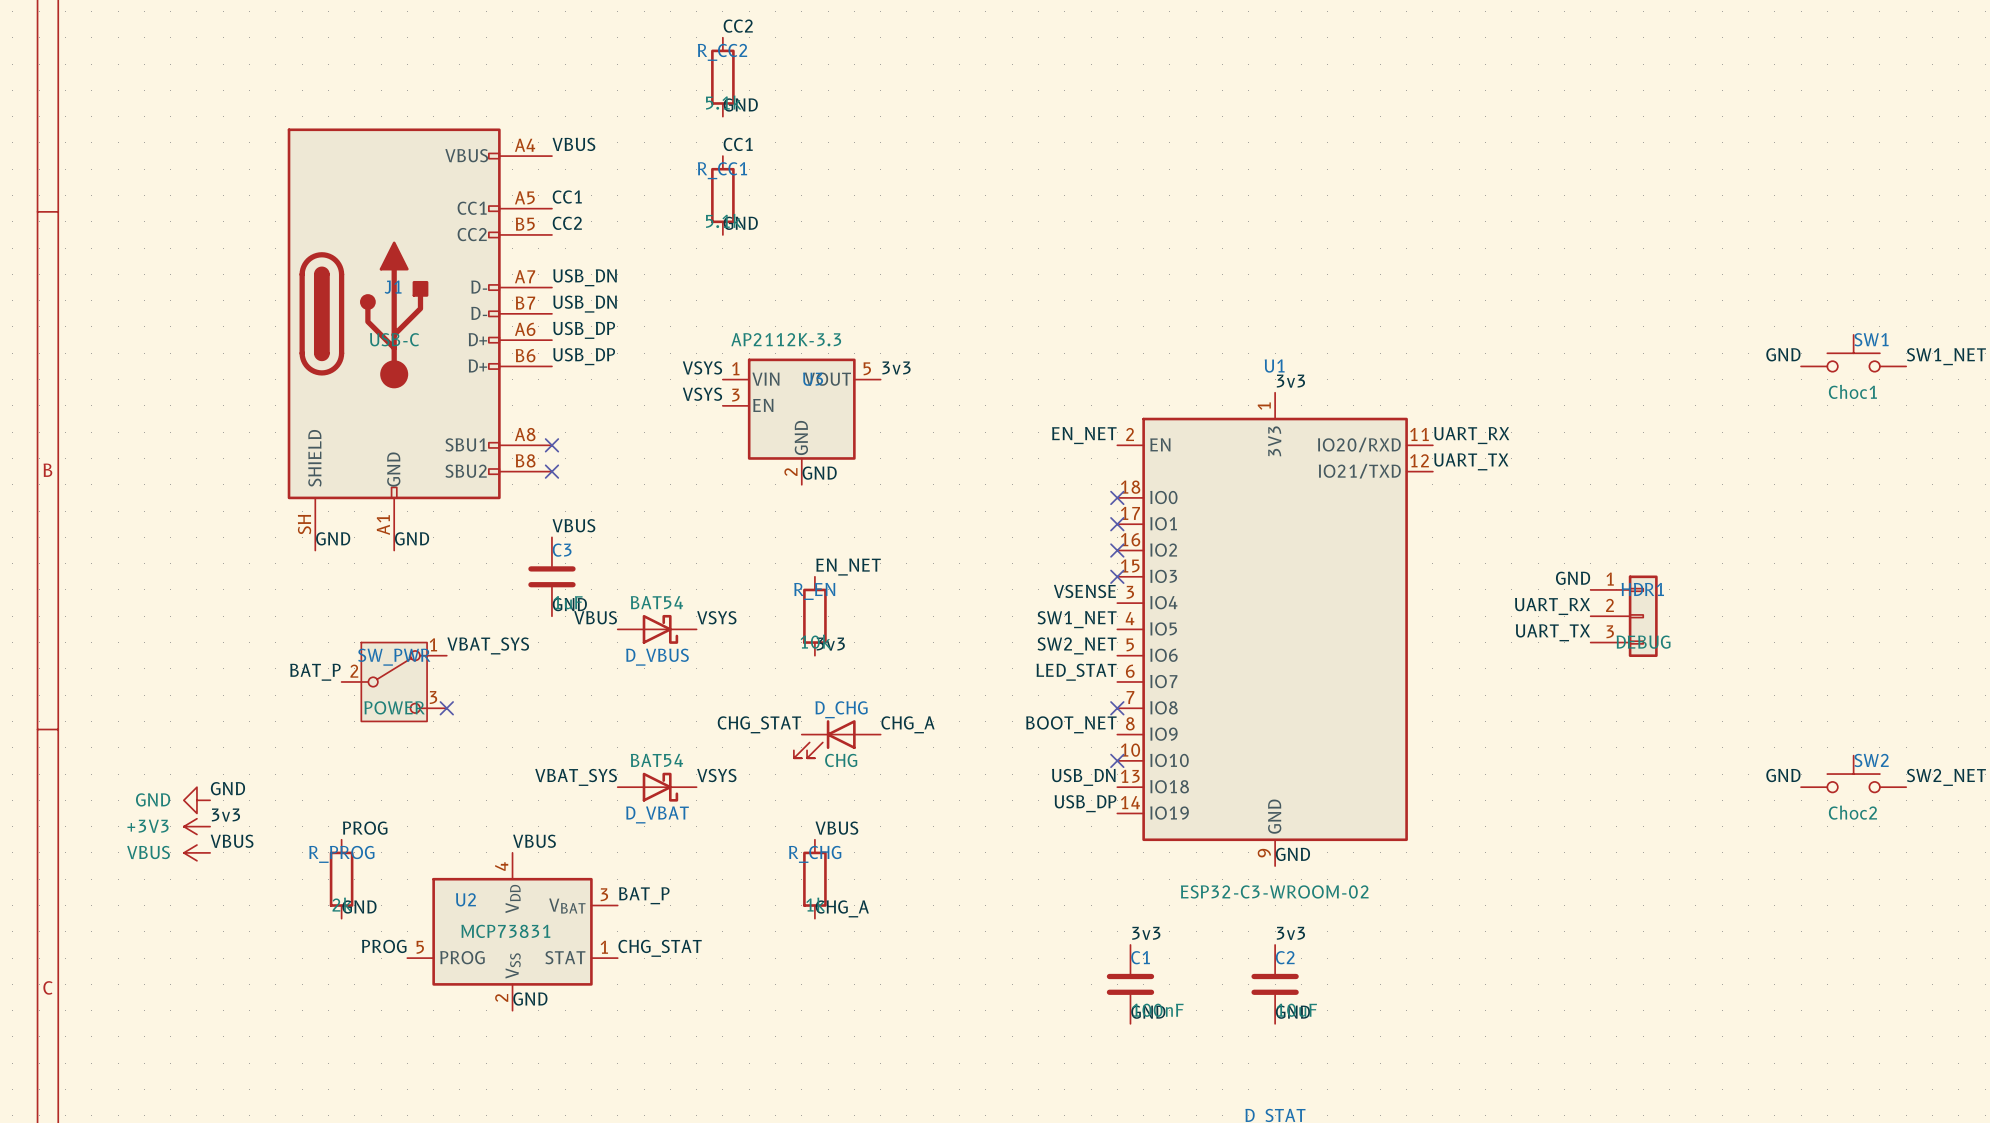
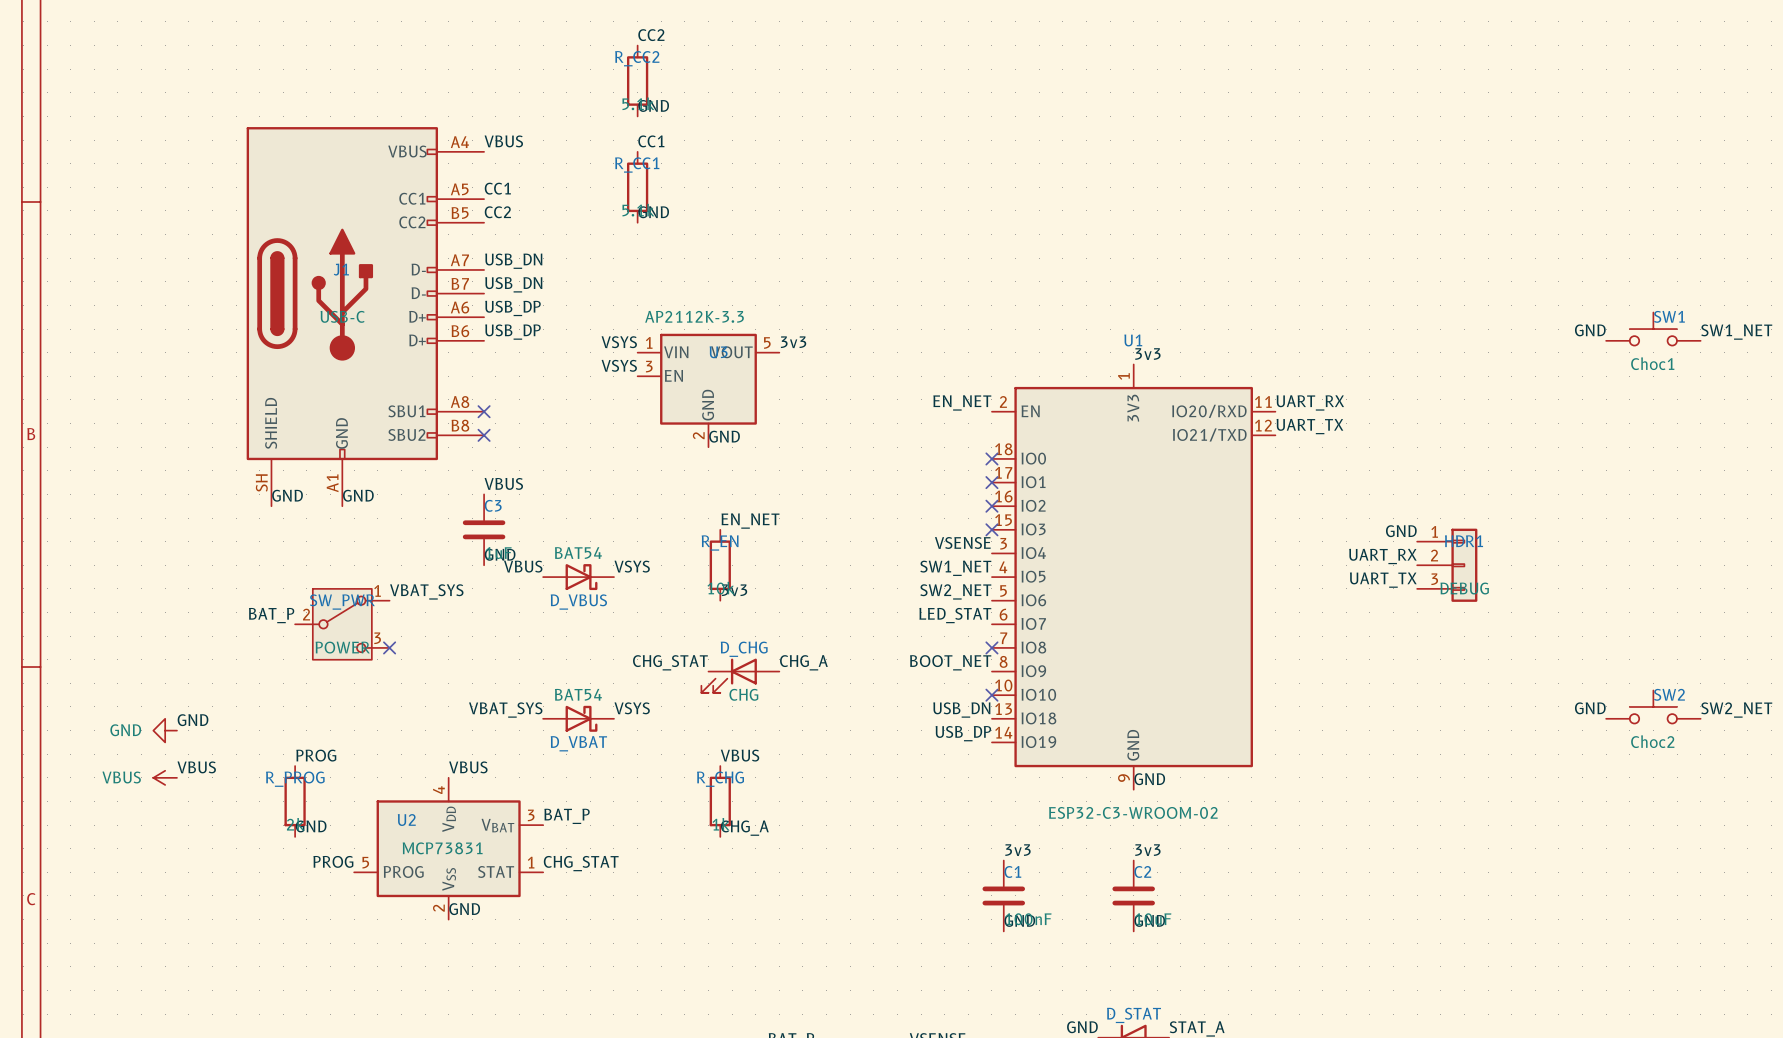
label: 3v3 (225, 815) -> none
power symbol: +3V3 (196, 826) -> none

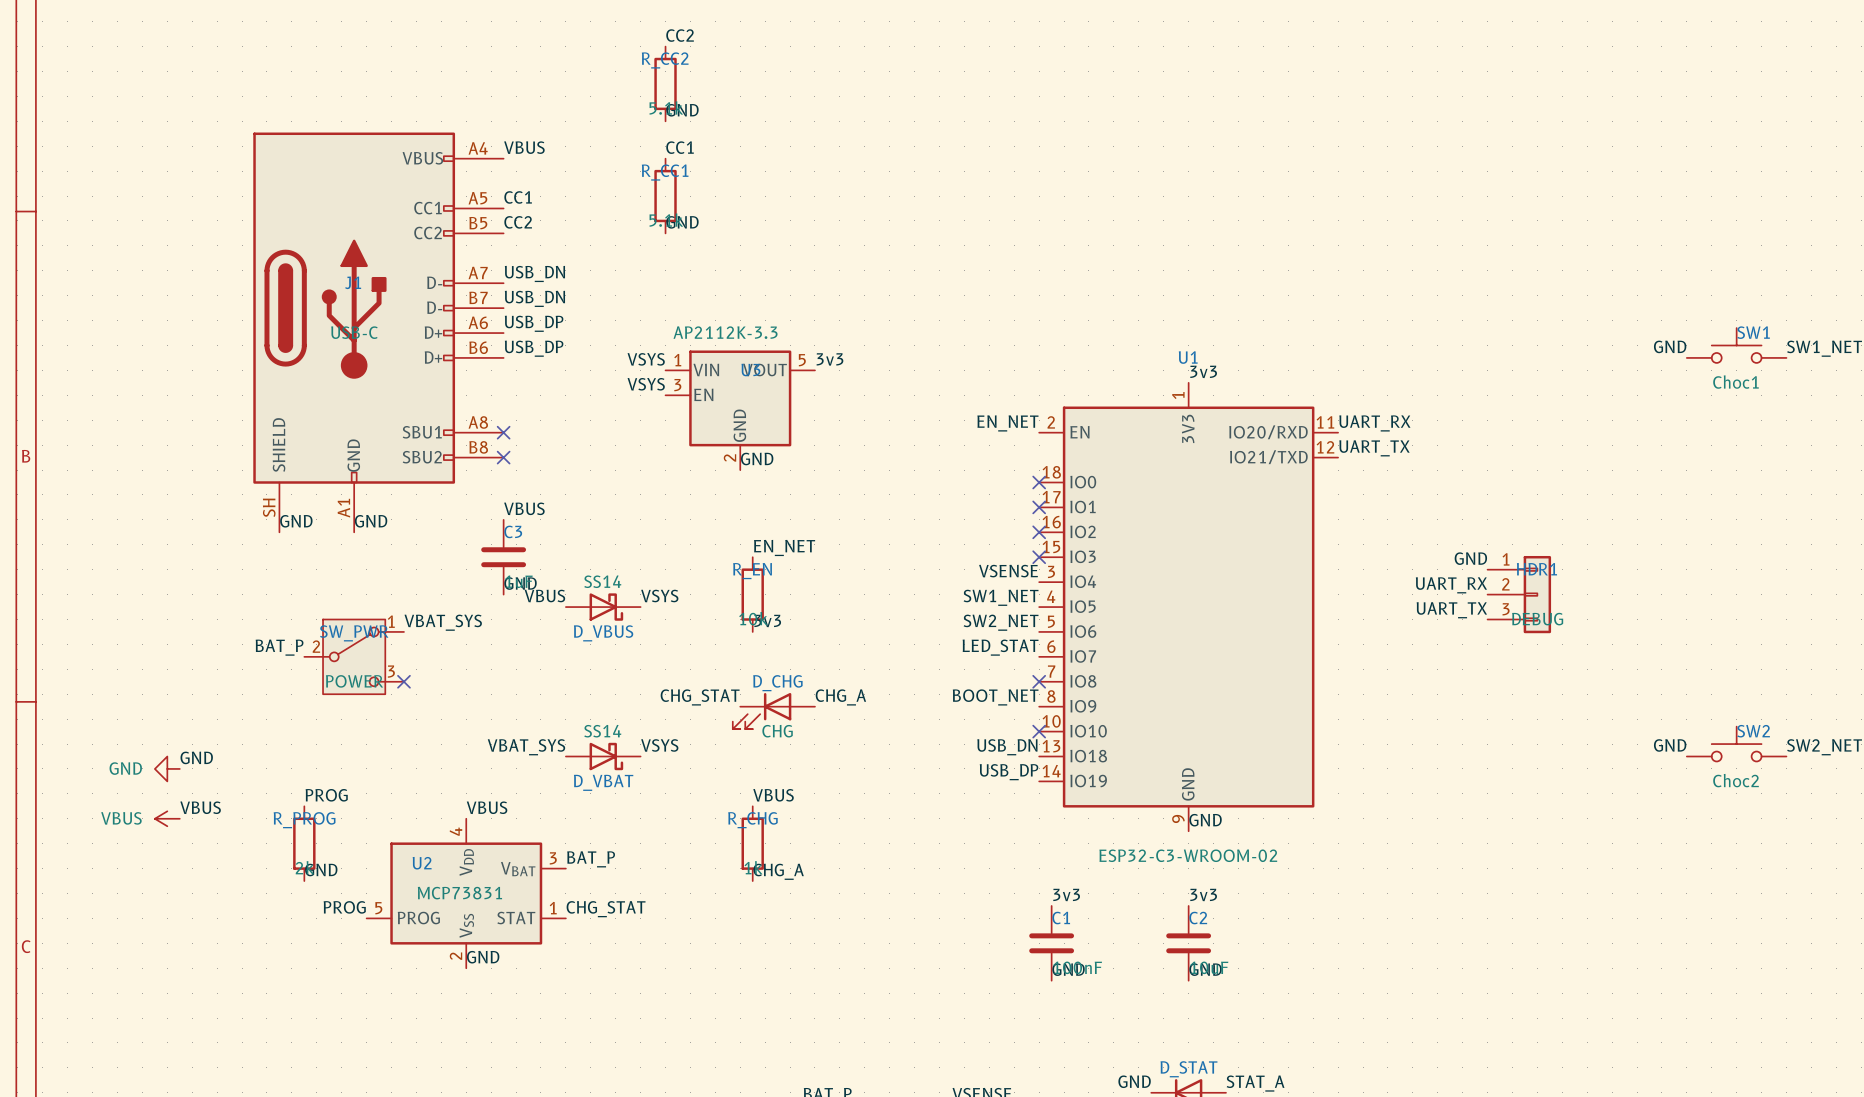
D_VBUS value: BAT54 (578, 553) -> SS14 (602, 581)
D_VBAT value: BAT54 (578, 694) -> SS14 (602, 731)

